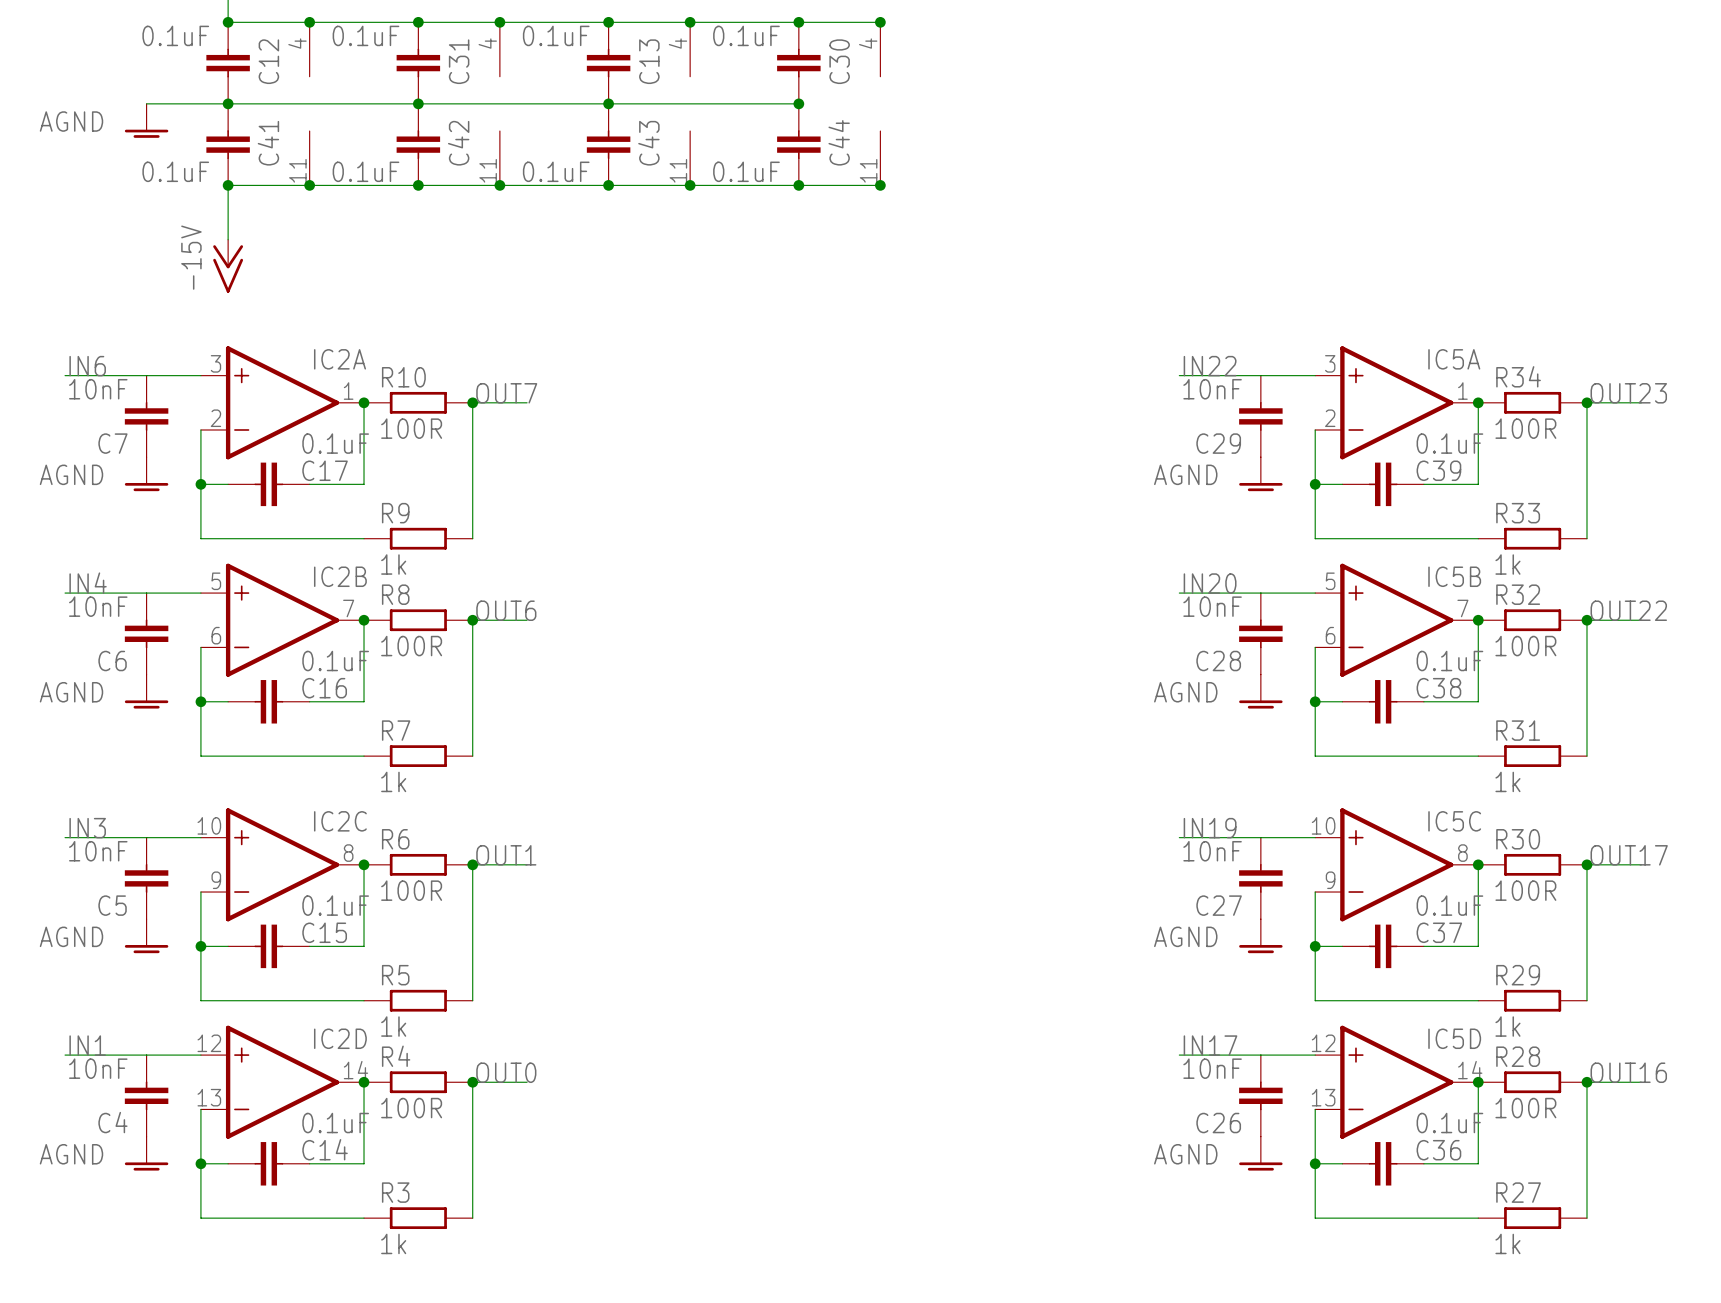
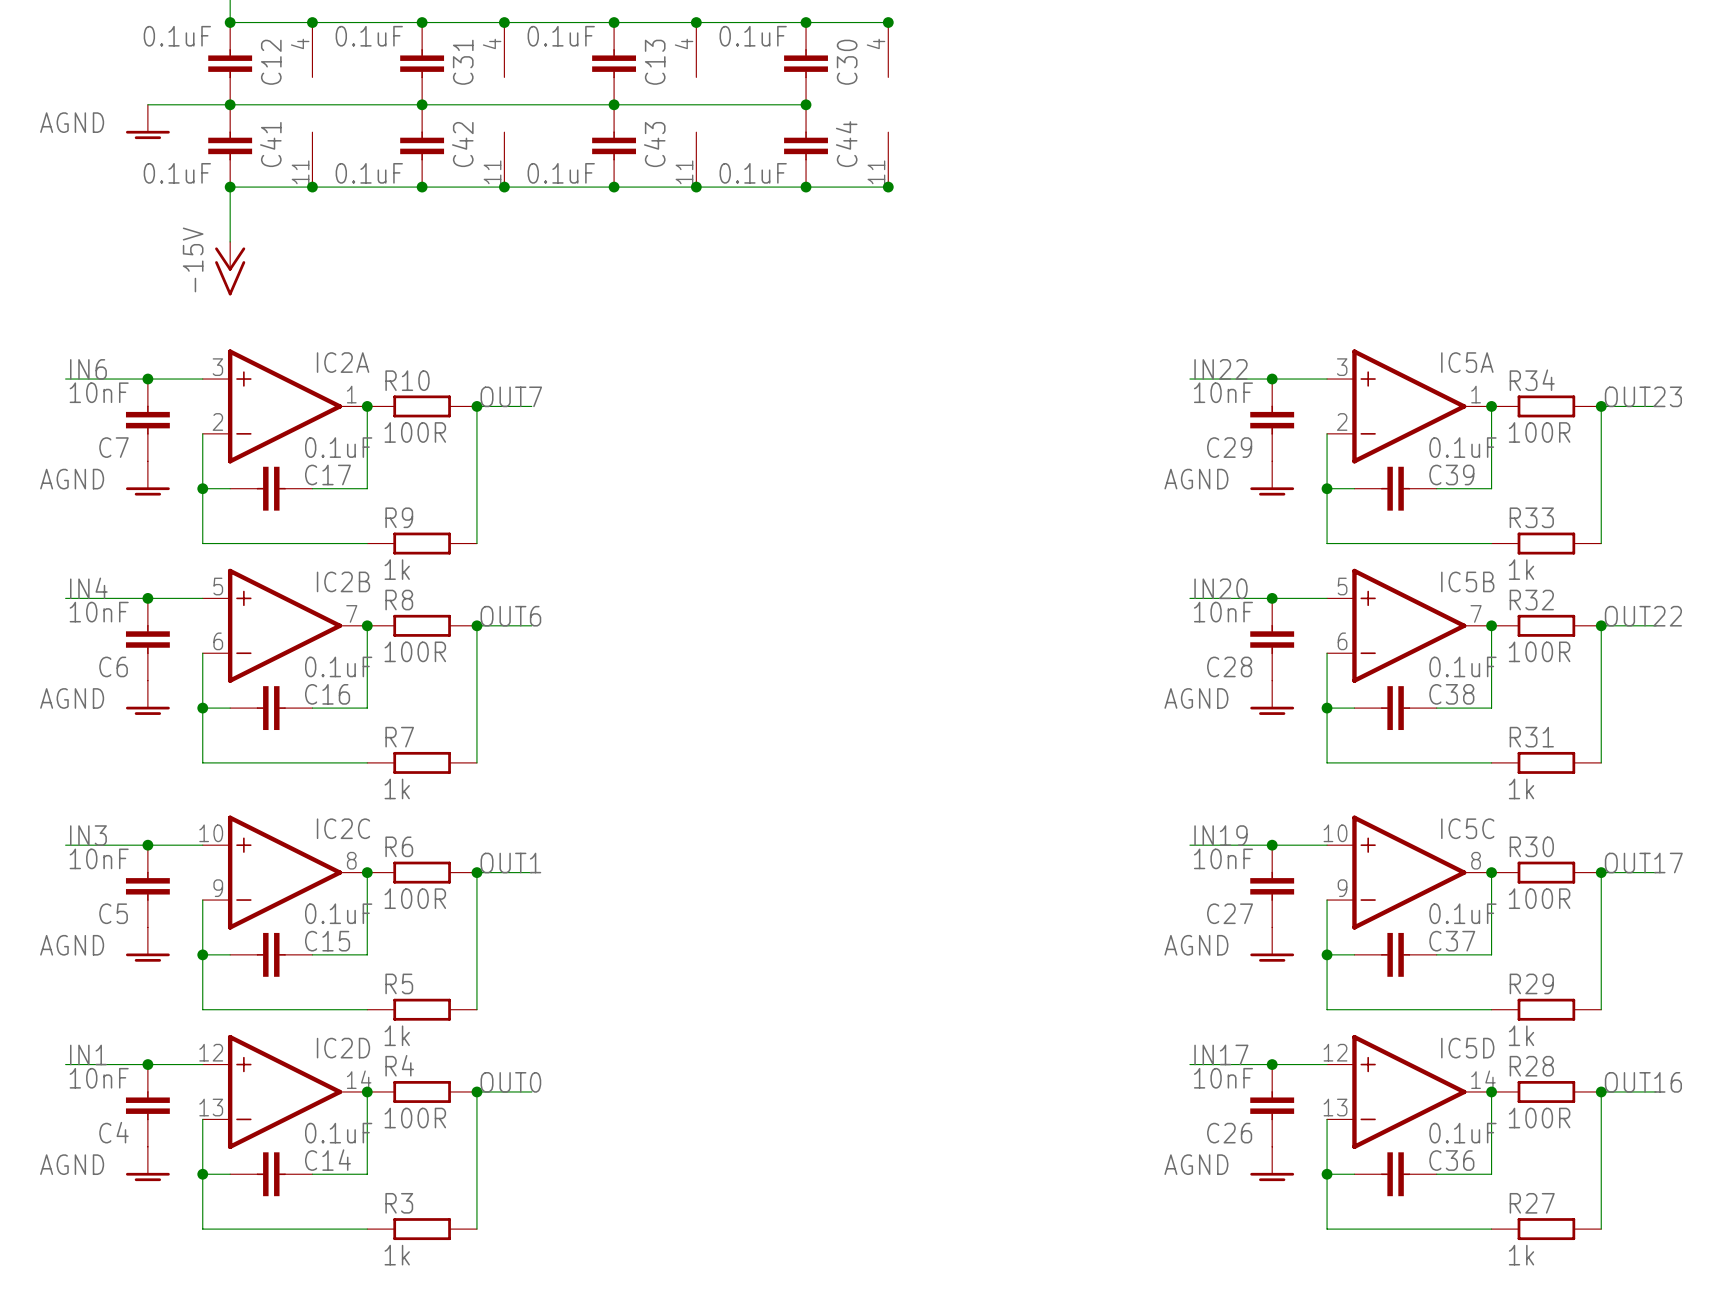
junction: none -> (147, 379)
junction: none -> (1272, 379)
junction: none -> (147, 598)
junction: none -> (1272, 598)
junction: none -> (147, 845)
junction: none -> (1272, 845)
junction: none -> (147, 1064)
junction: none -> (1272, 1064)

